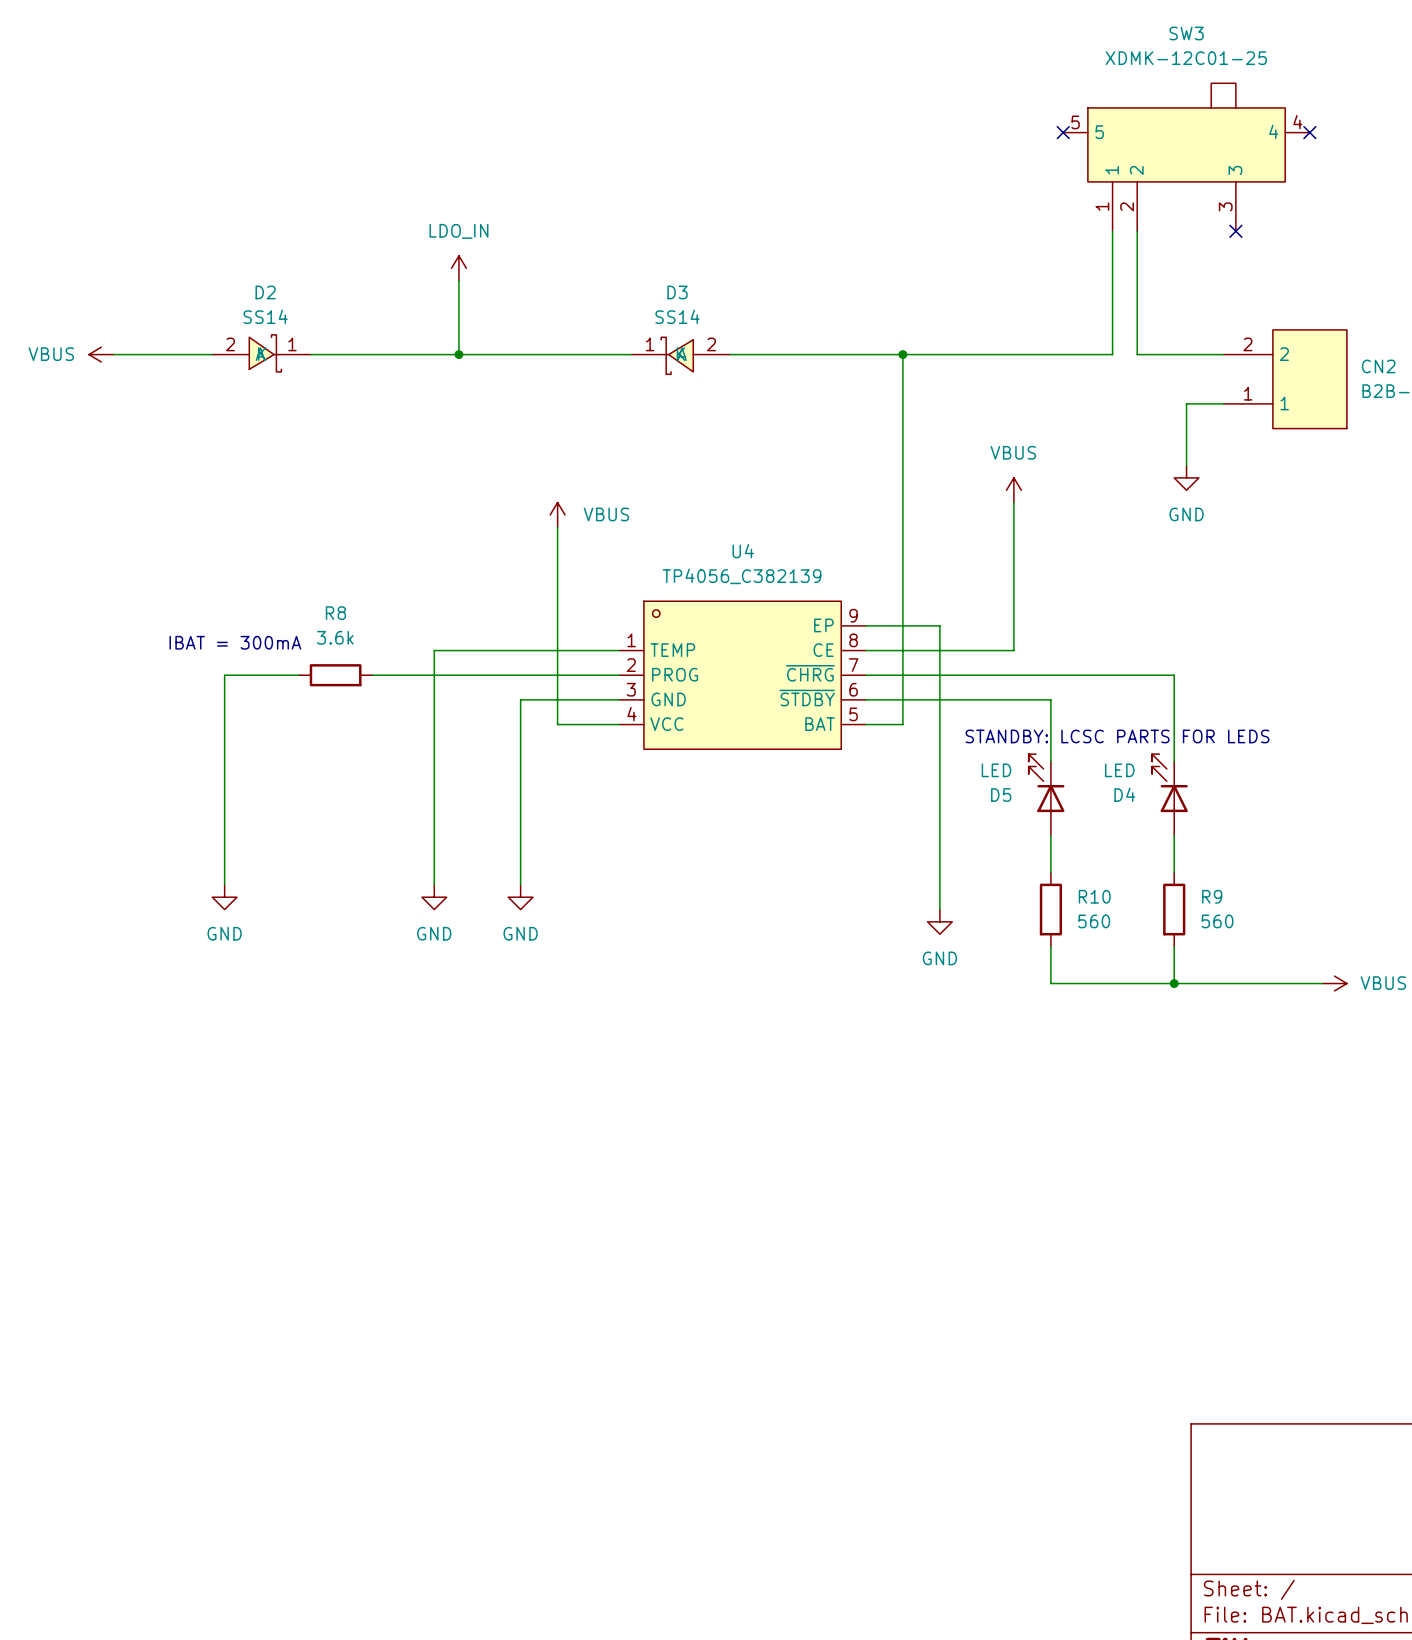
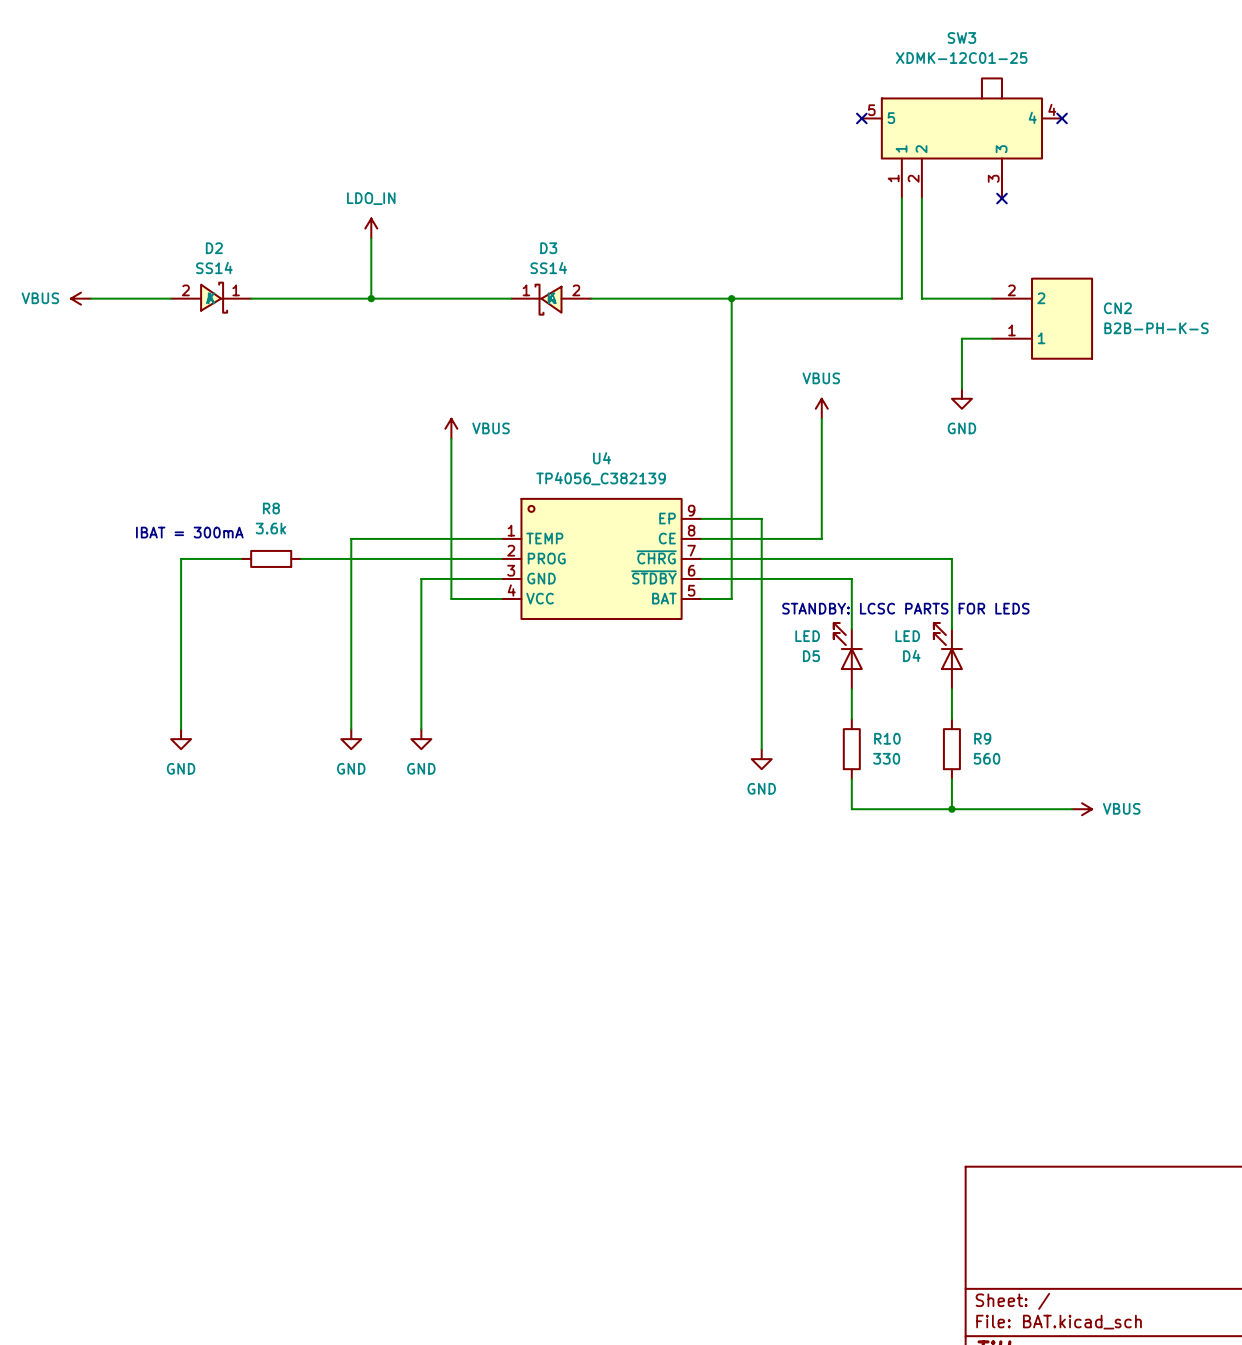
R10 value: 560 (1094, 921) -> 330 (886, 758)

